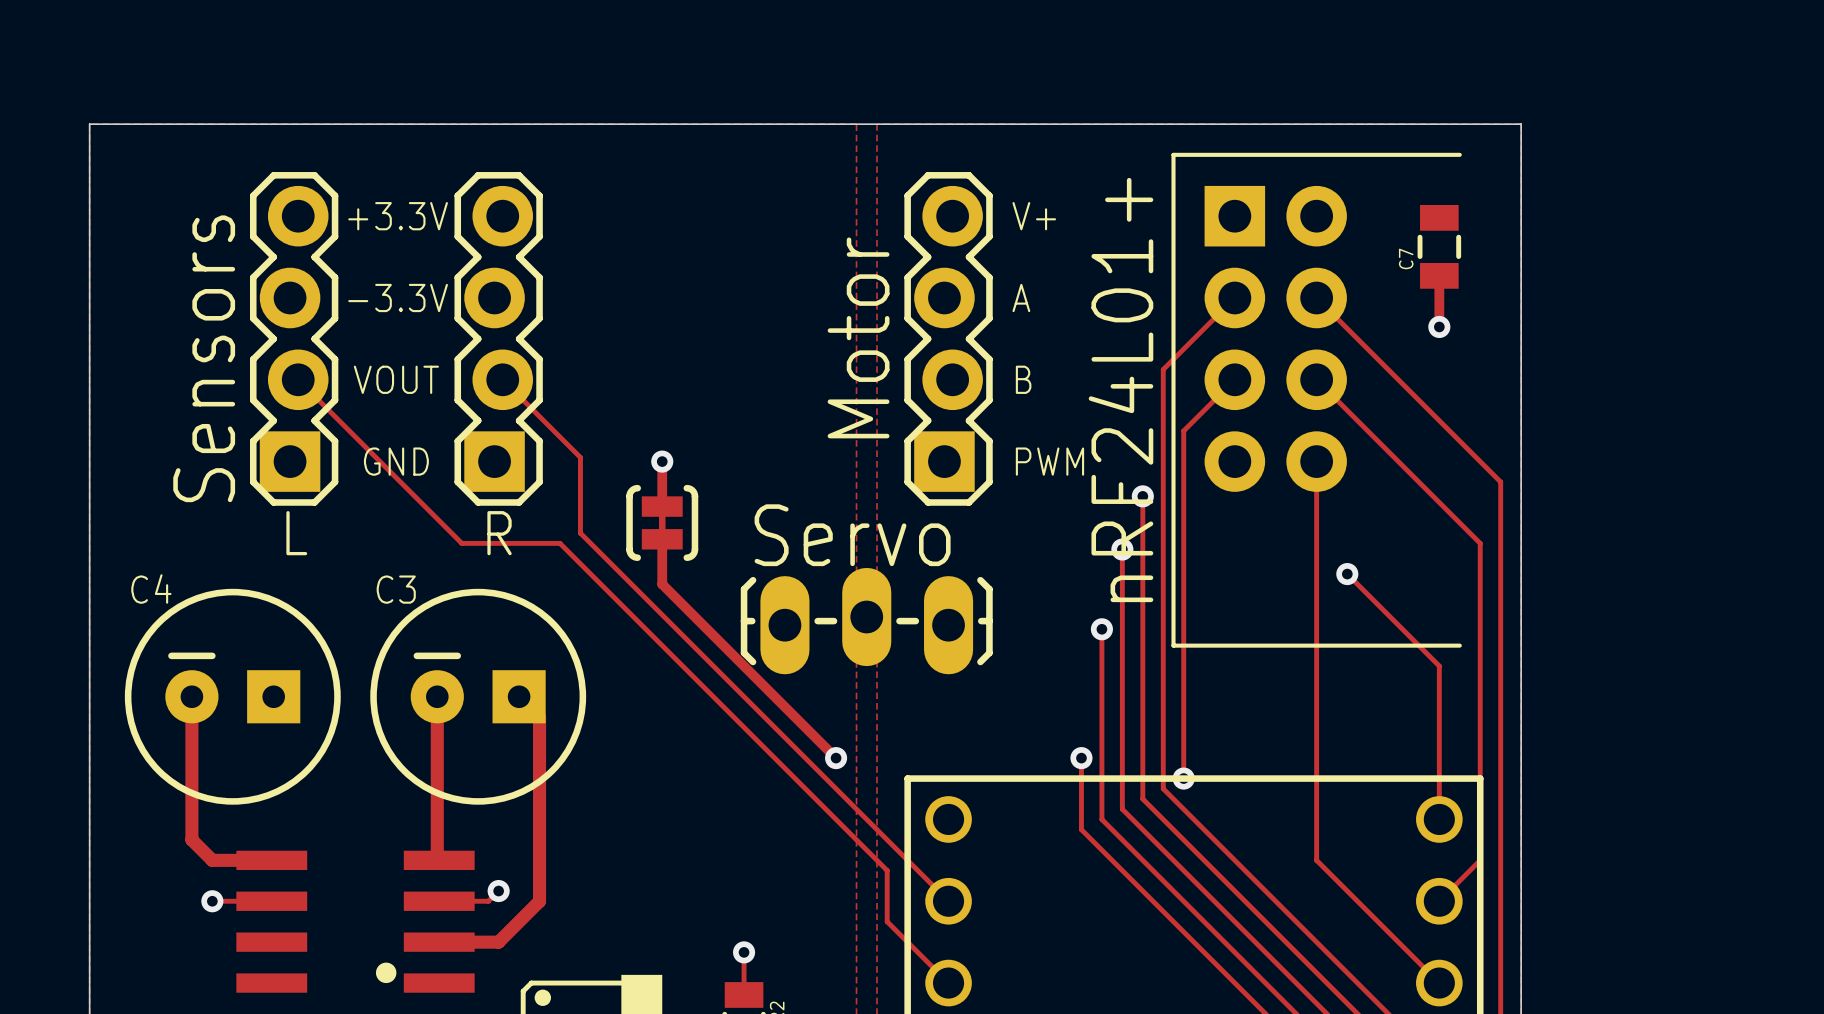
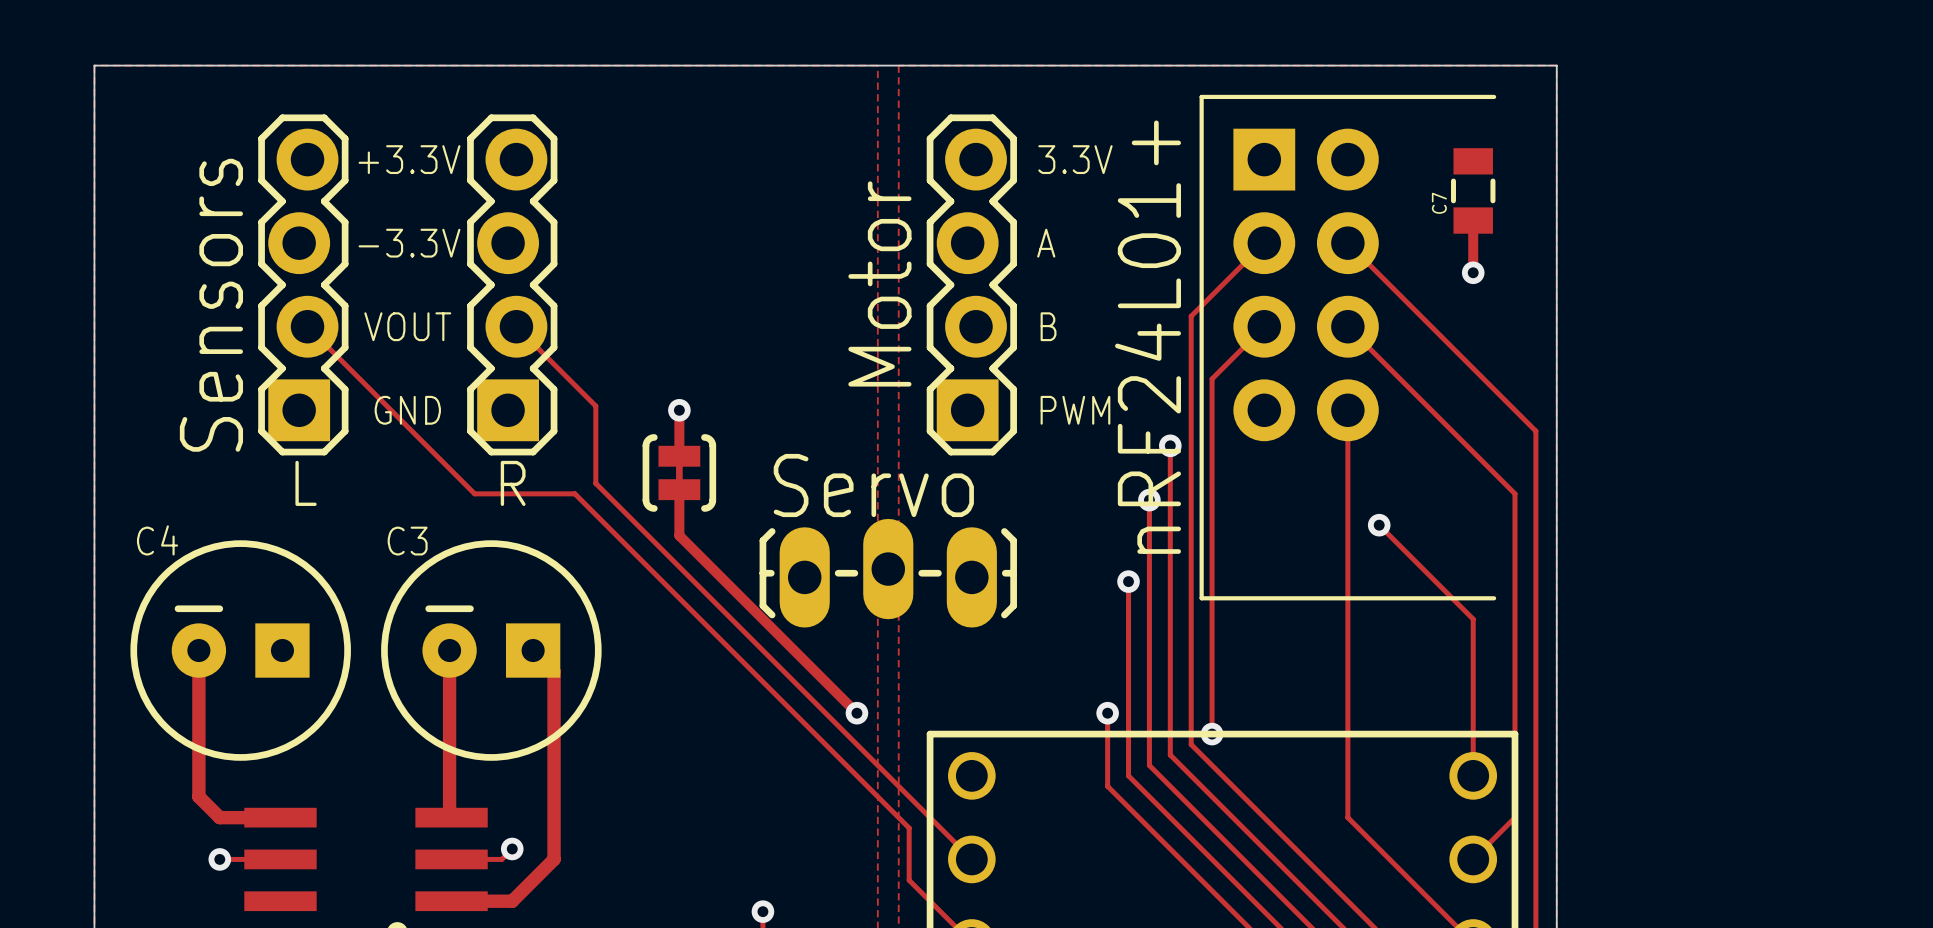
text: V+ (1034, 216) -> 3.3V (1075, 159)

